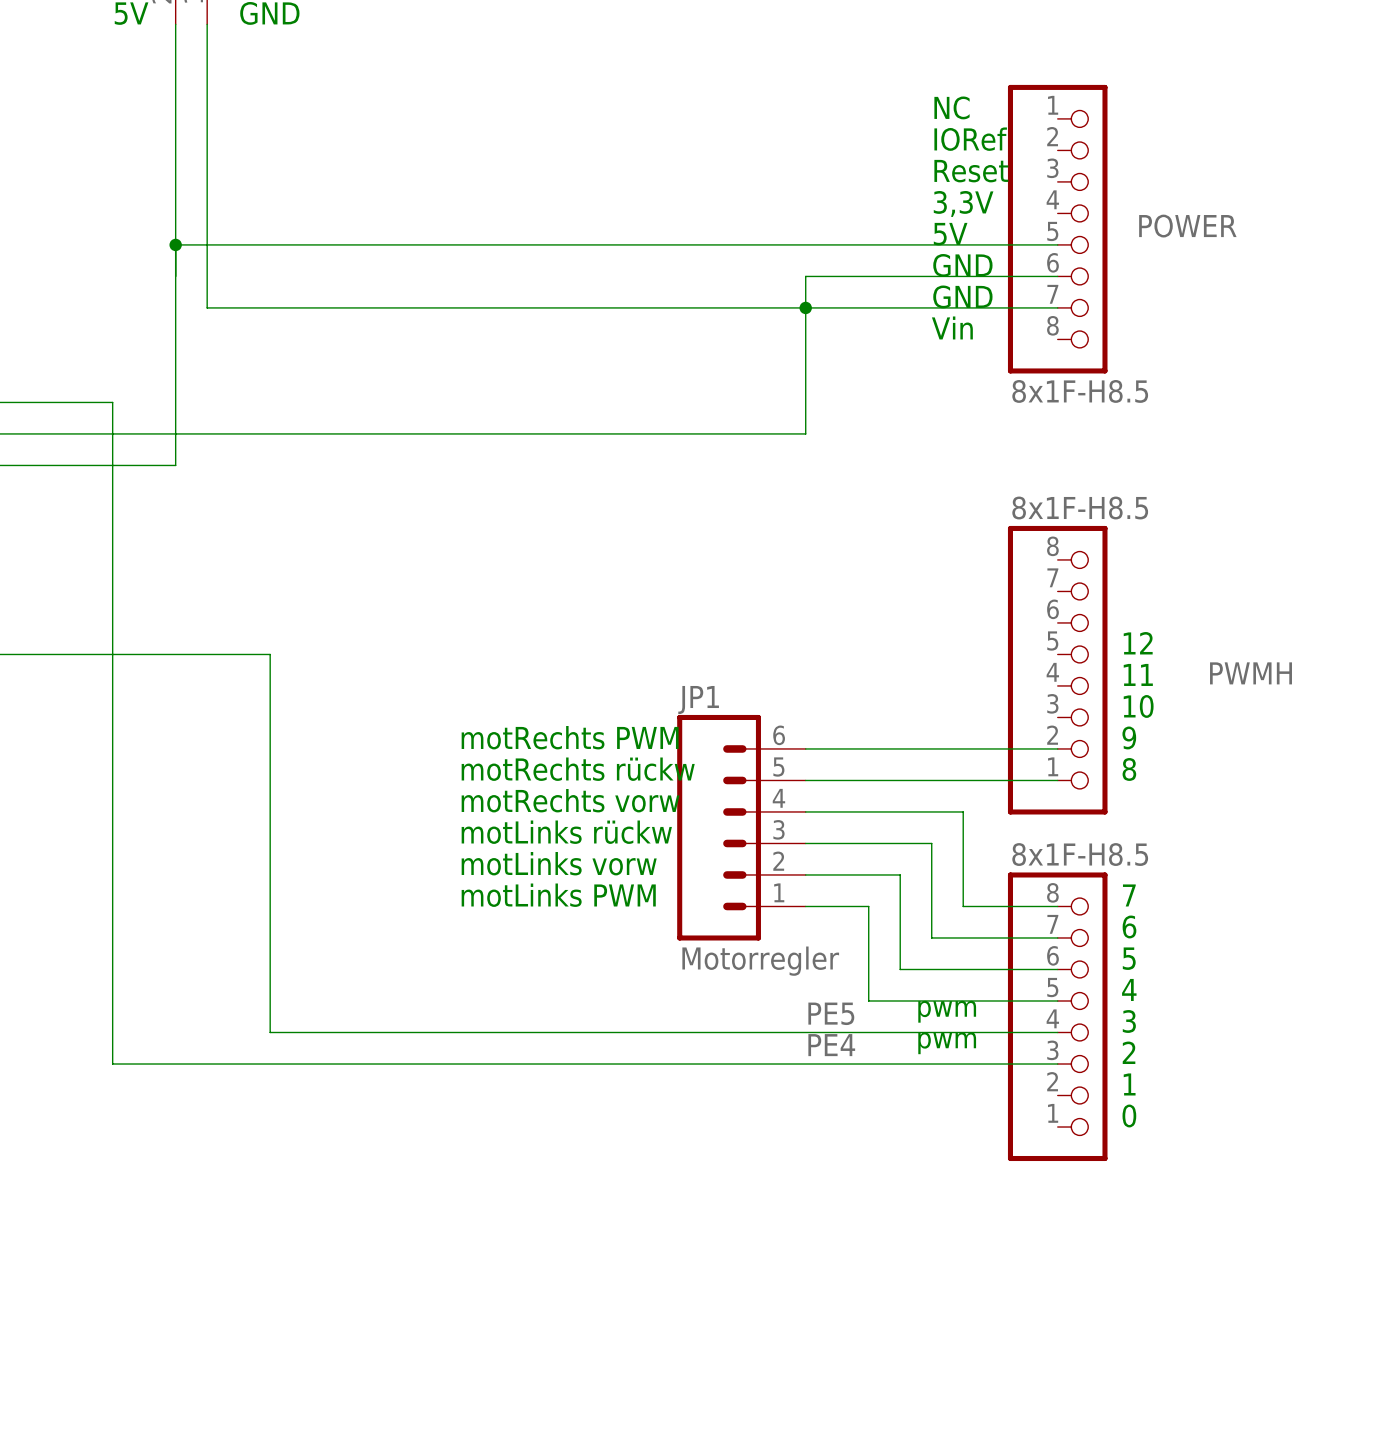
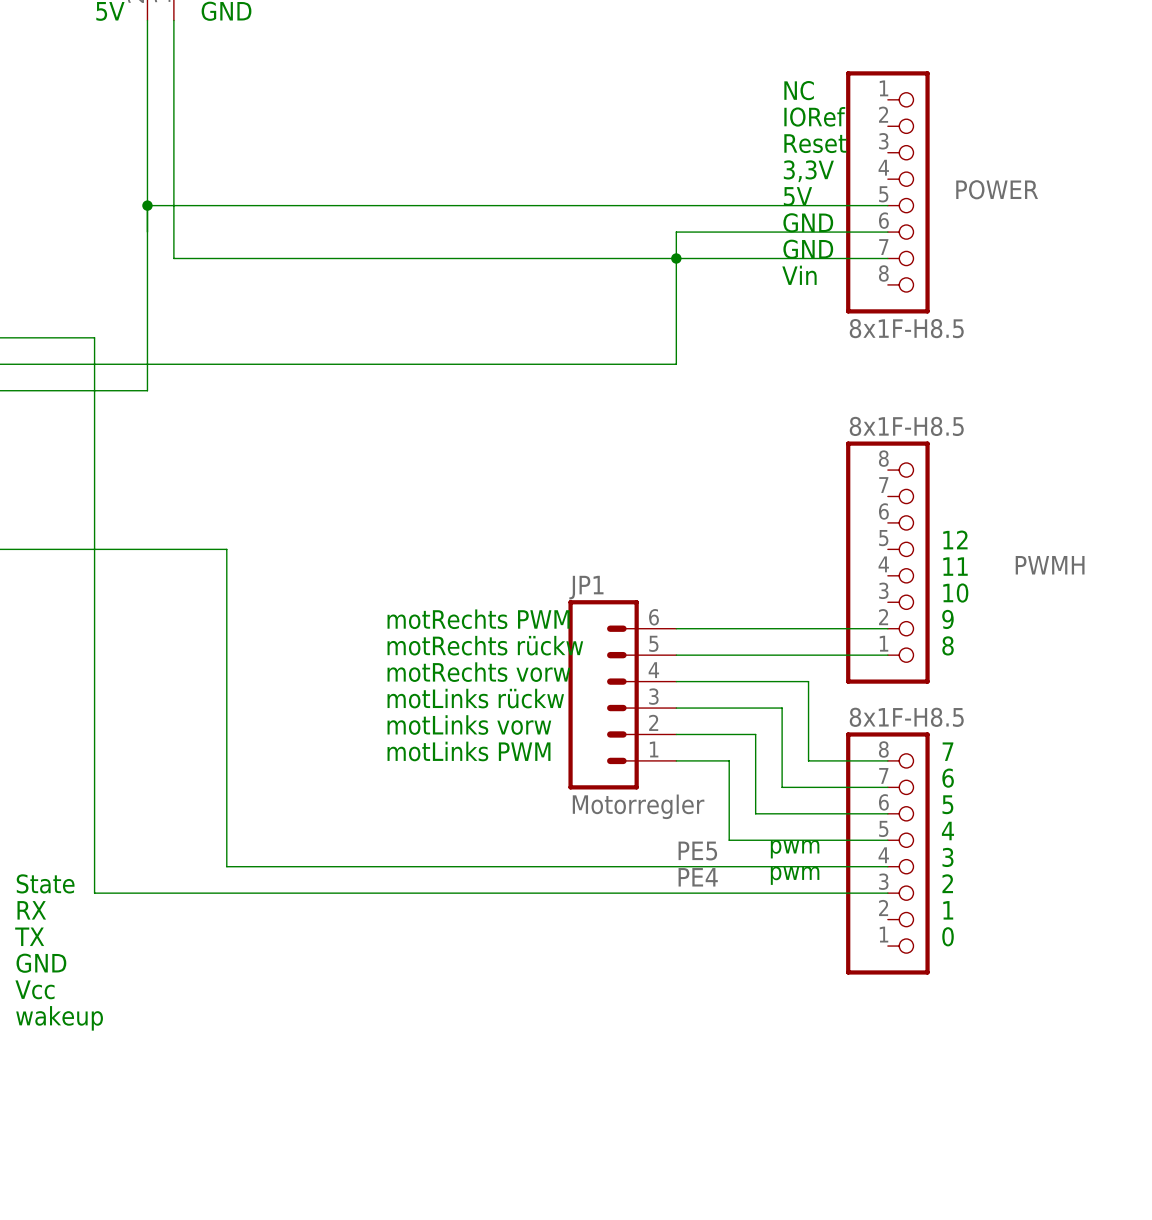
text: none -> State (45, 883)
text: none -> RX (31, 910)
text: none -> TX (29, 936)
text: none -> GND (41, 963)
text: none -> Vcc (35, 989)
text: none -> wakeup (59, 1018)

